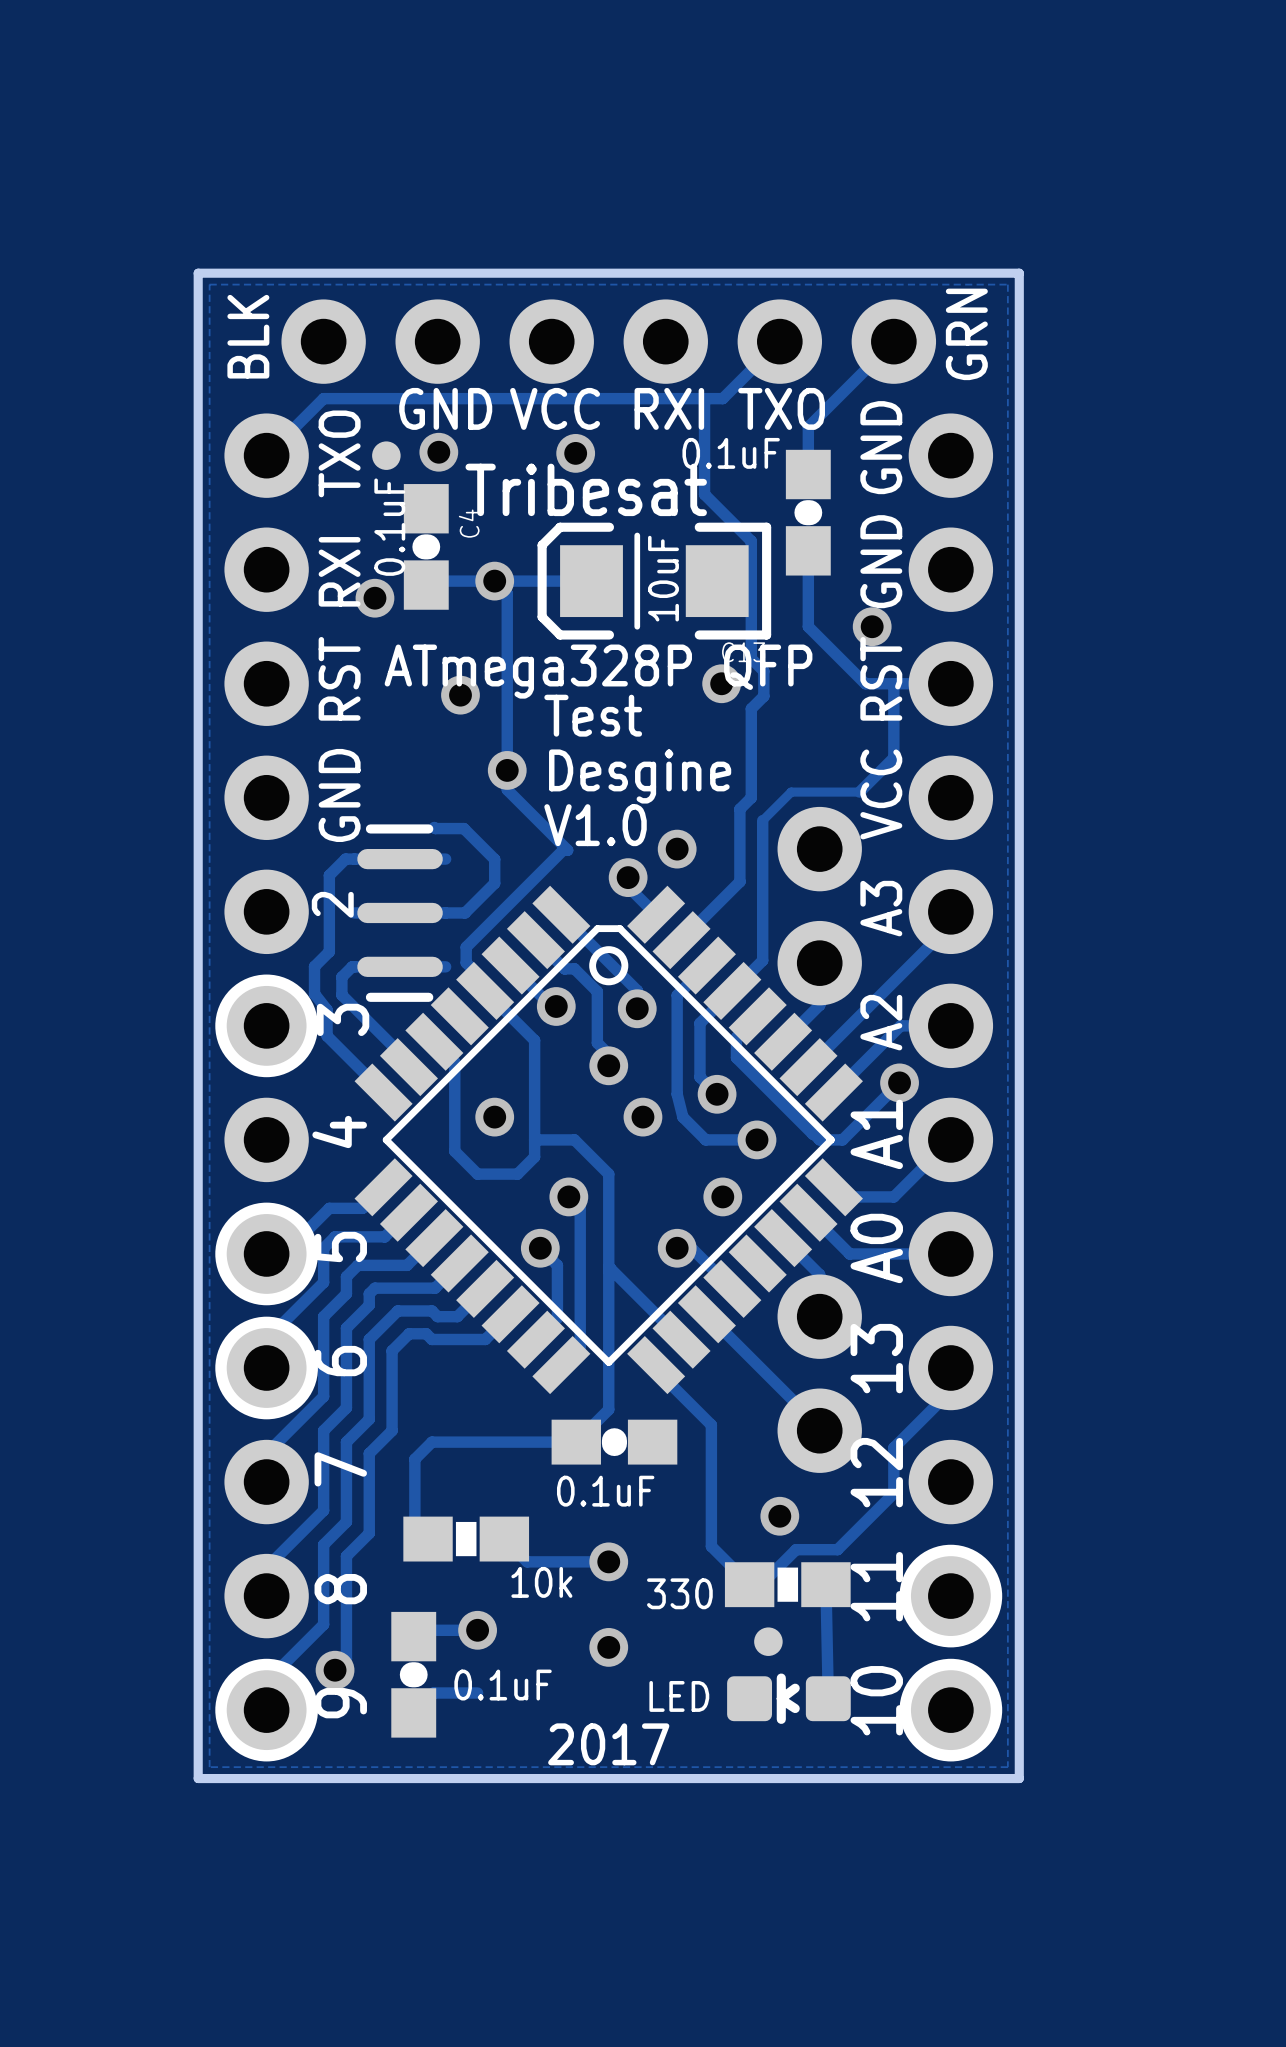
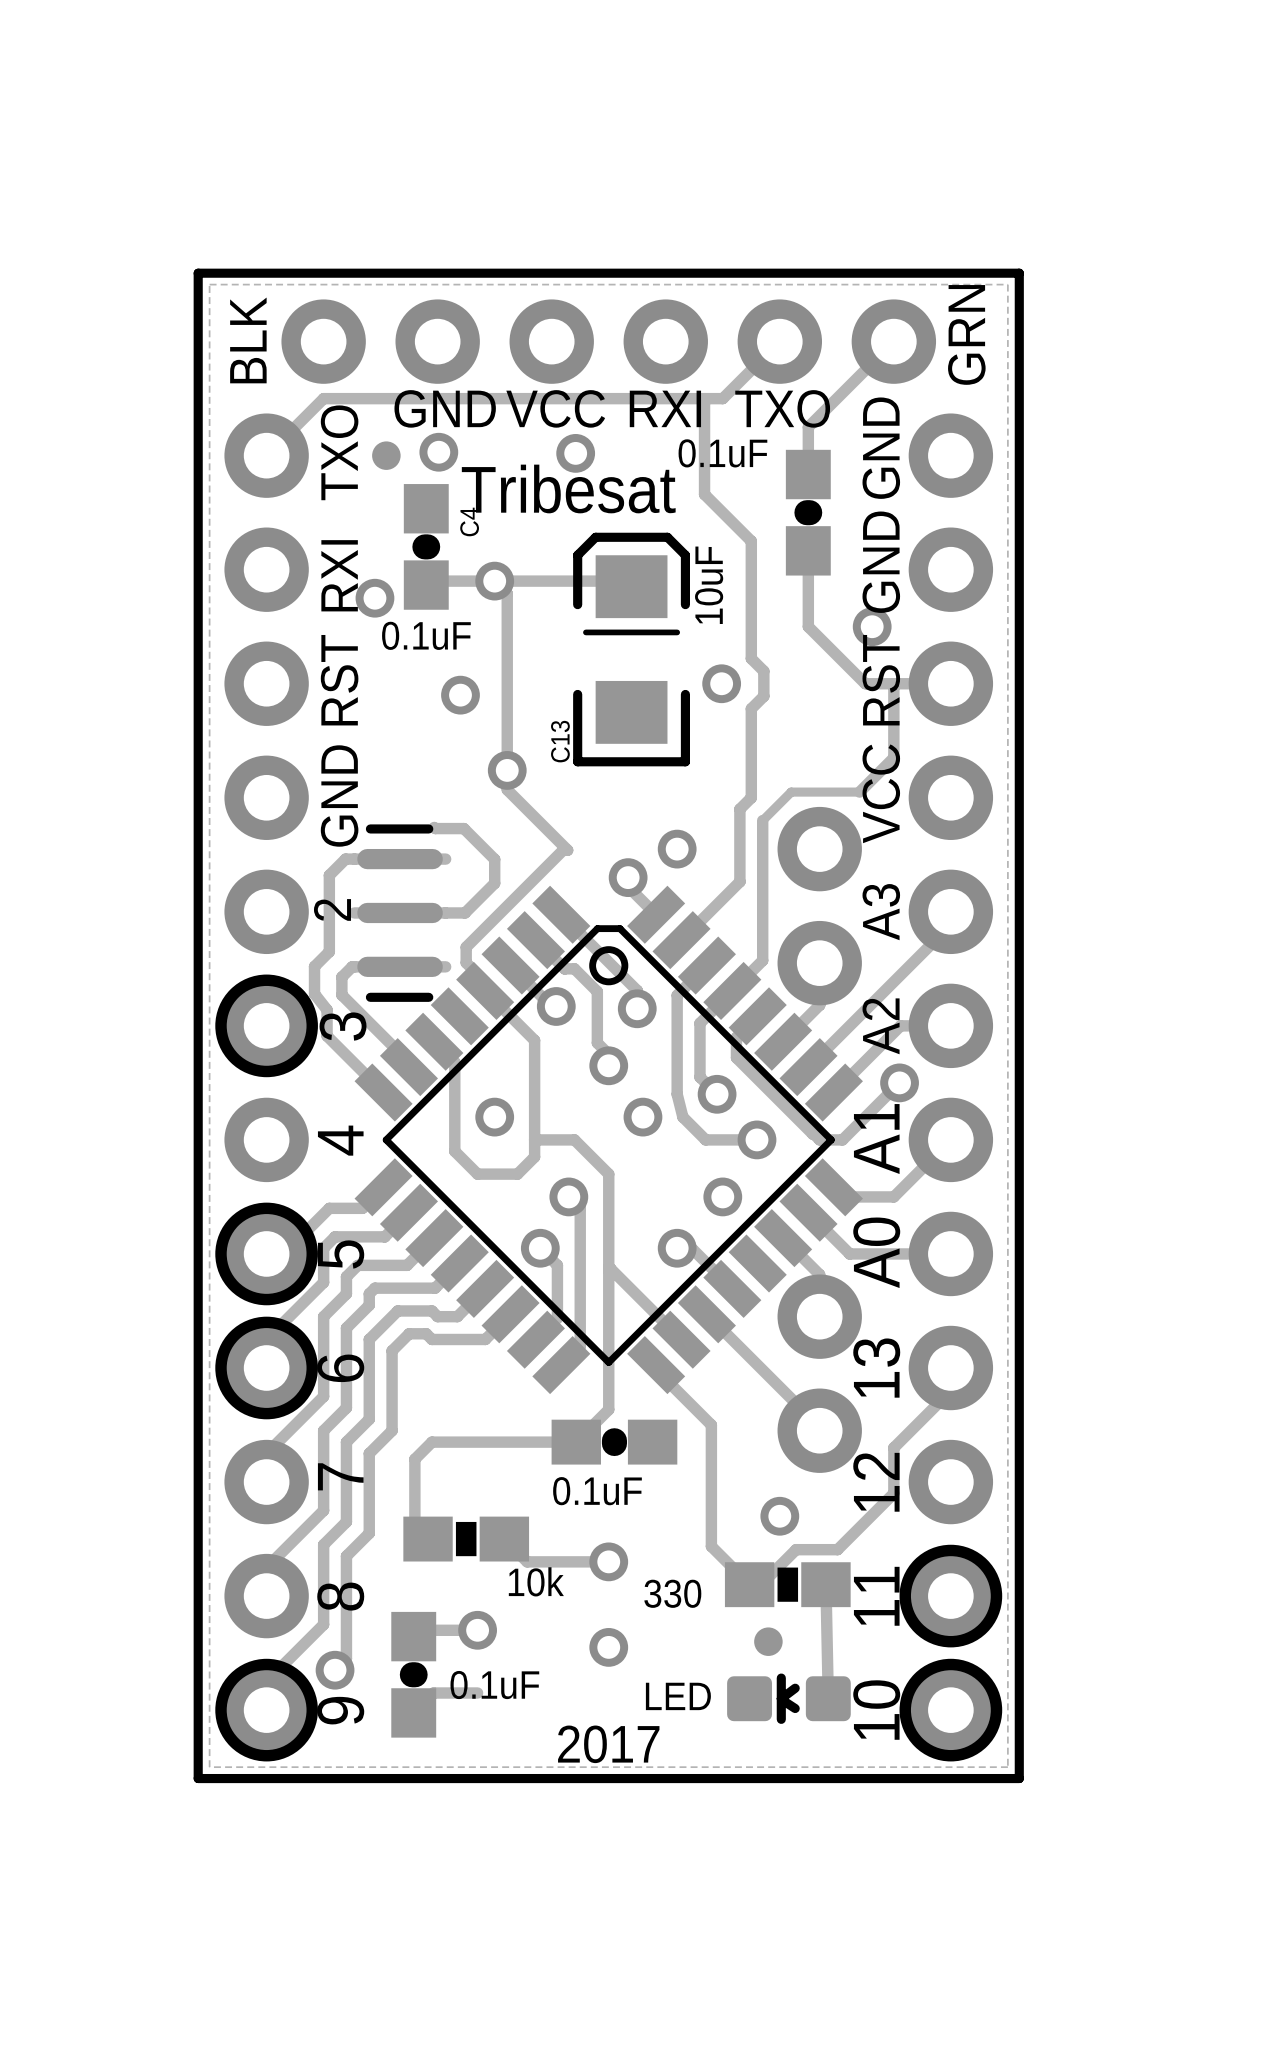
text rotation: 0° (389, 527) -> 90° clockwise (426, 635)
text position: 0.1uF (389, 527) -> 0.1uF (426, 635)
text position: 10uF (663, 578) -> 10uF (709, 585)
C13 rotation: 0° (654, 581) -> 90° clockwise (631, 649)
text: ATmega328P QFP (598, 671) -> none
text: Test (593, 715) -> none
text: Desgine (640, 776) -> none
text: V1.0 (595, 825) -> none

